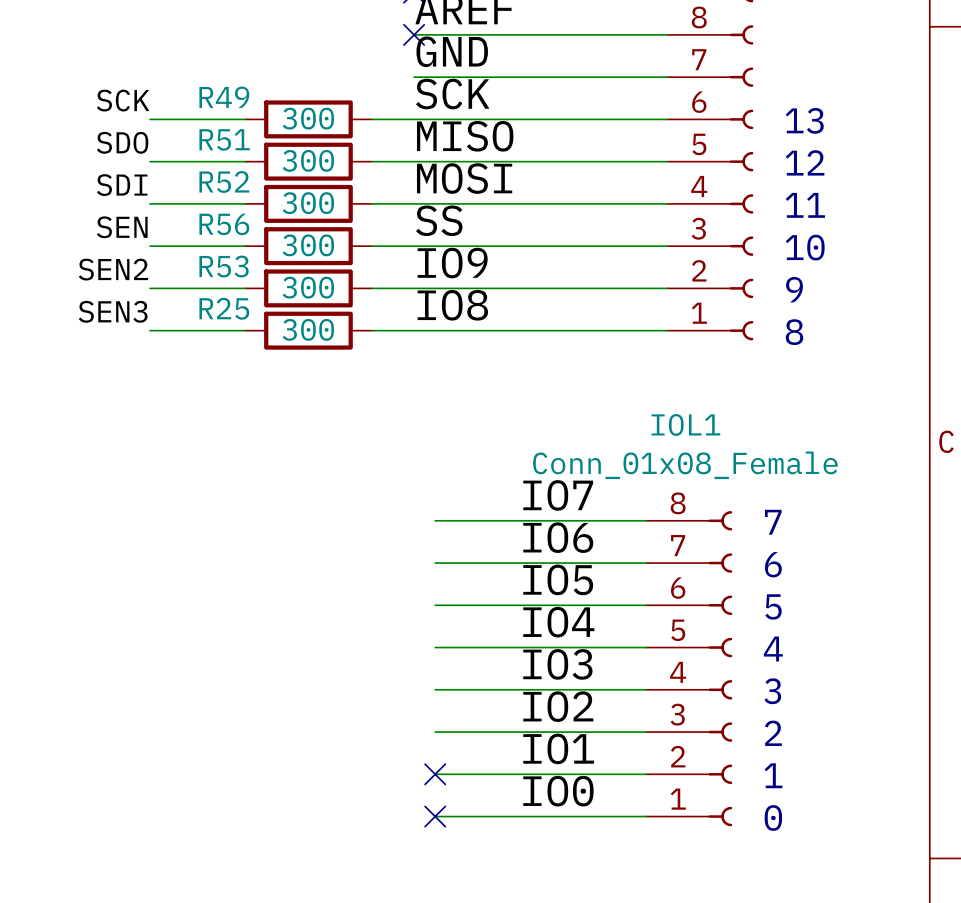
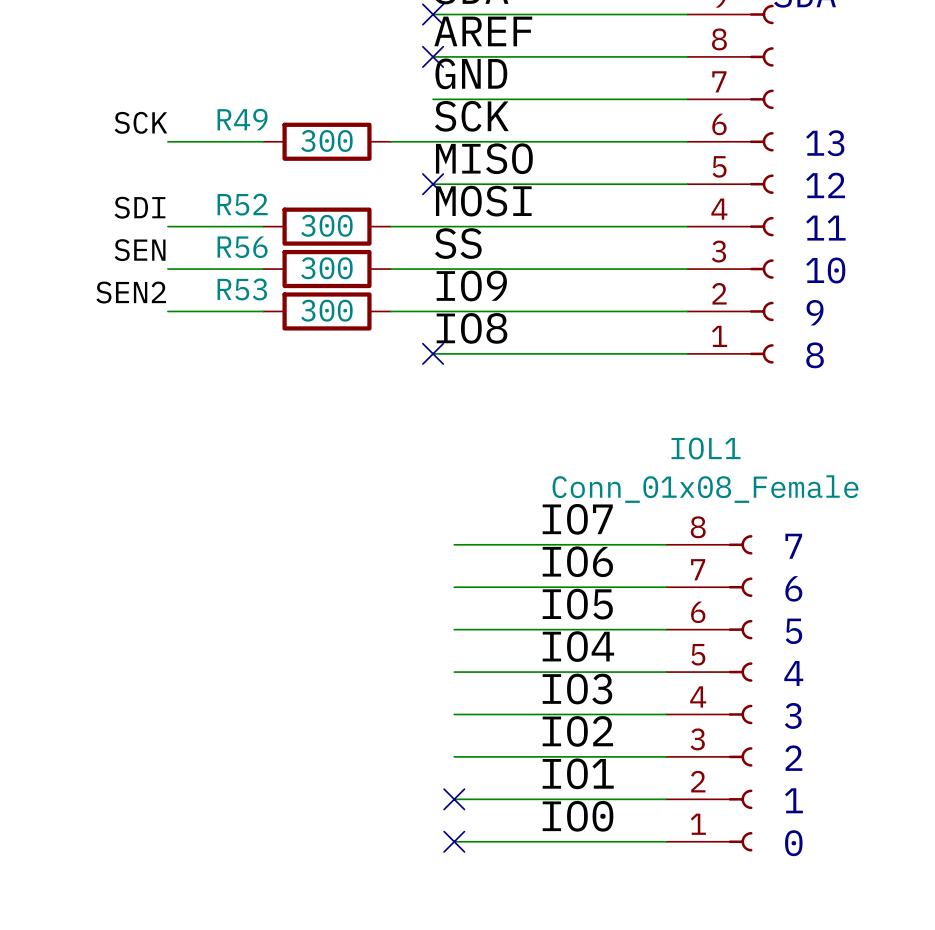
label: SDO (122, 142) -> none
wire: (150, 161) (245, 161) -> none
R51: 300 (308, 161) -> none
wire: (371, 161) (414, 161) -> none
no-connect mark: none -> (433, 184)
label: SEN3 (113, 311) -> none
wire: (150, 330) (245, 330) -> none
R25: 300 (308, 330) -> none
wire: (371, 330) (414, 330) -> none
no-connect mark: none -> (433, 353)

